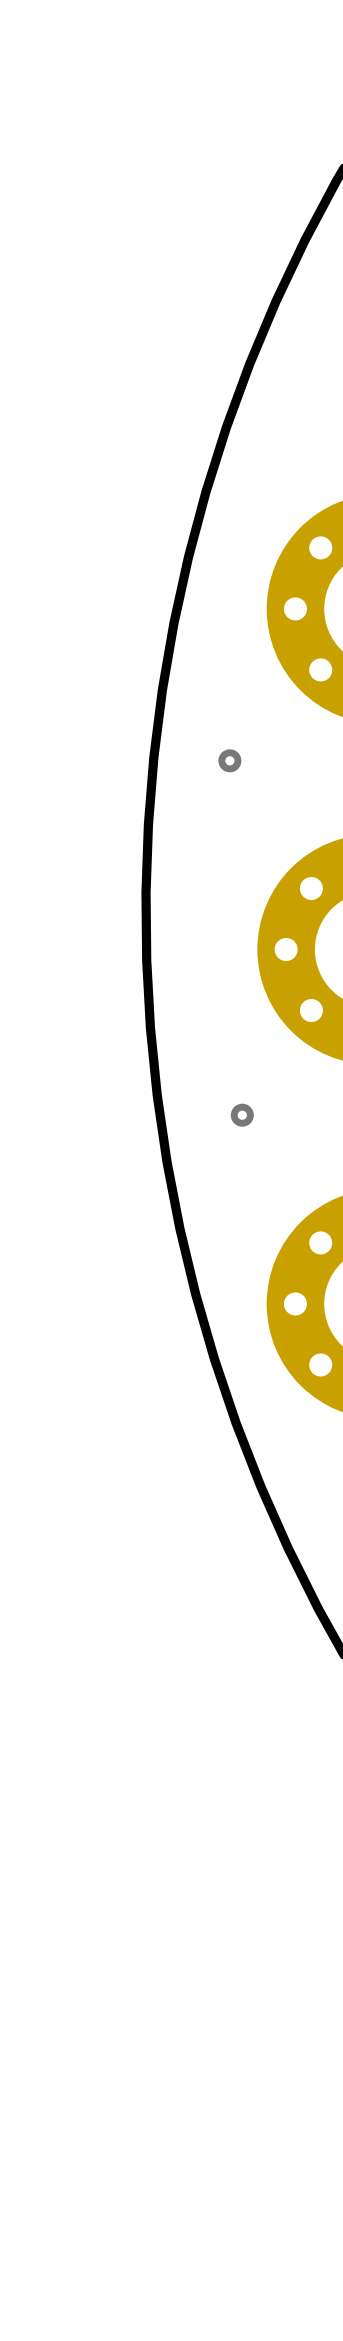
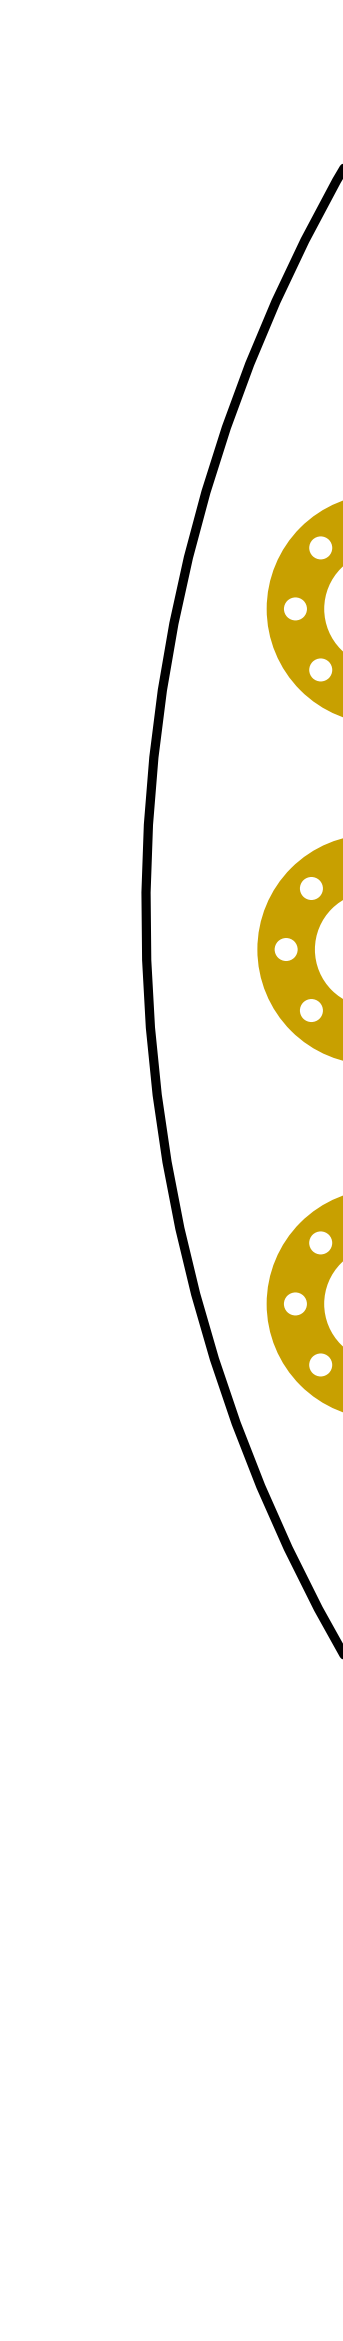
via: (229, 760) -> none
via: (242, 1115) -> none

